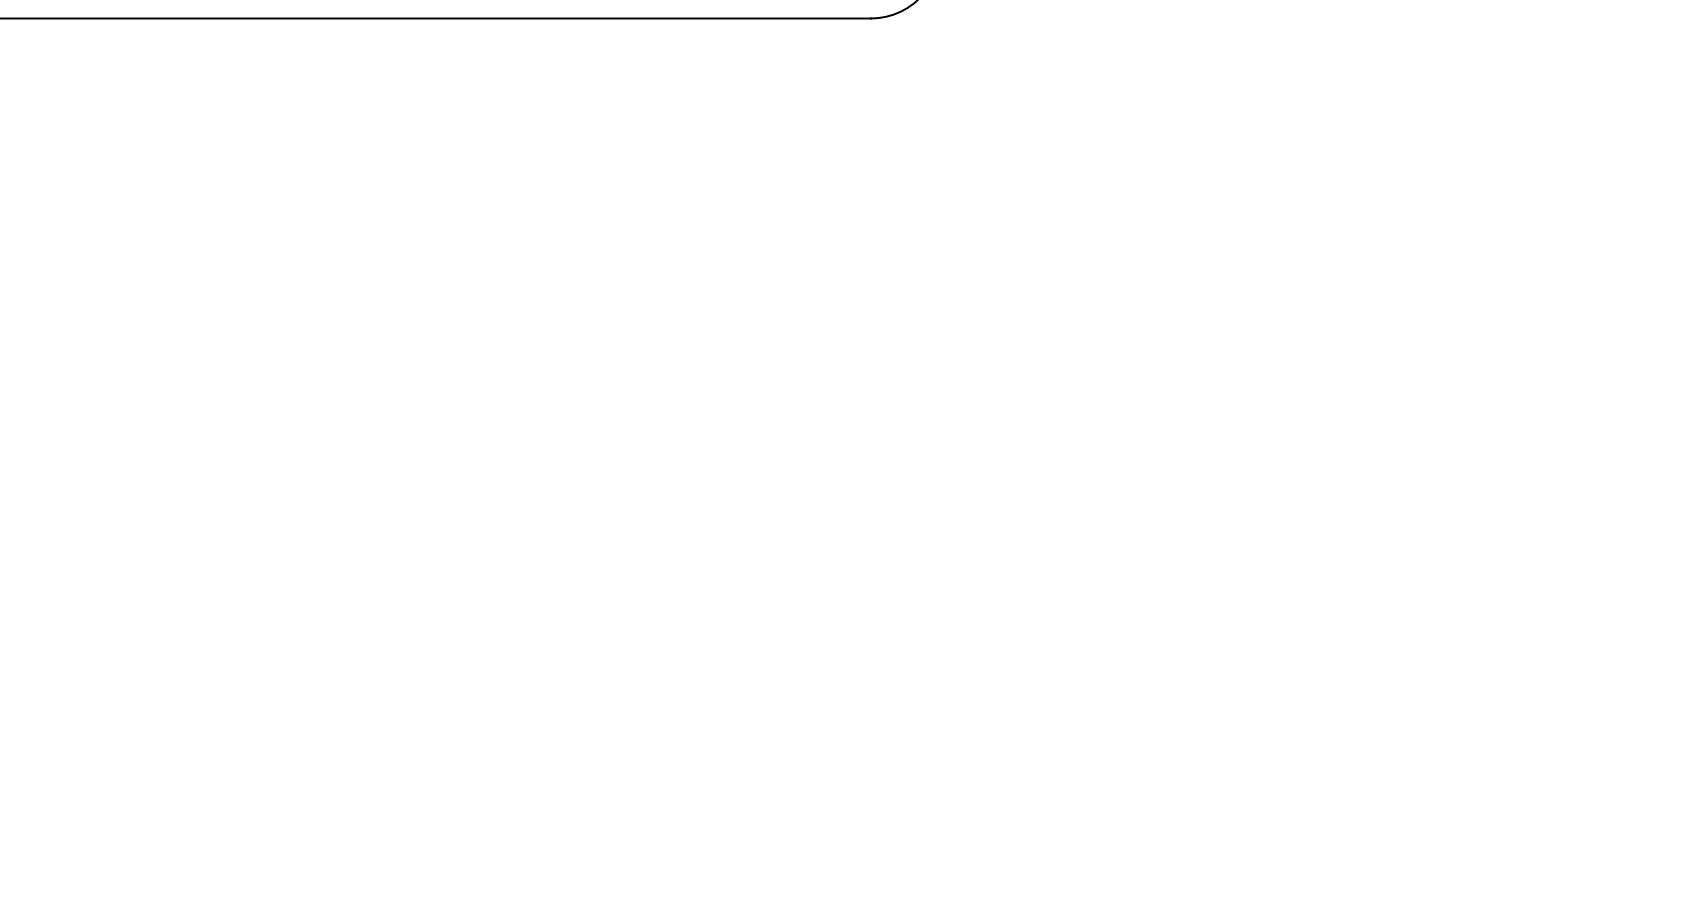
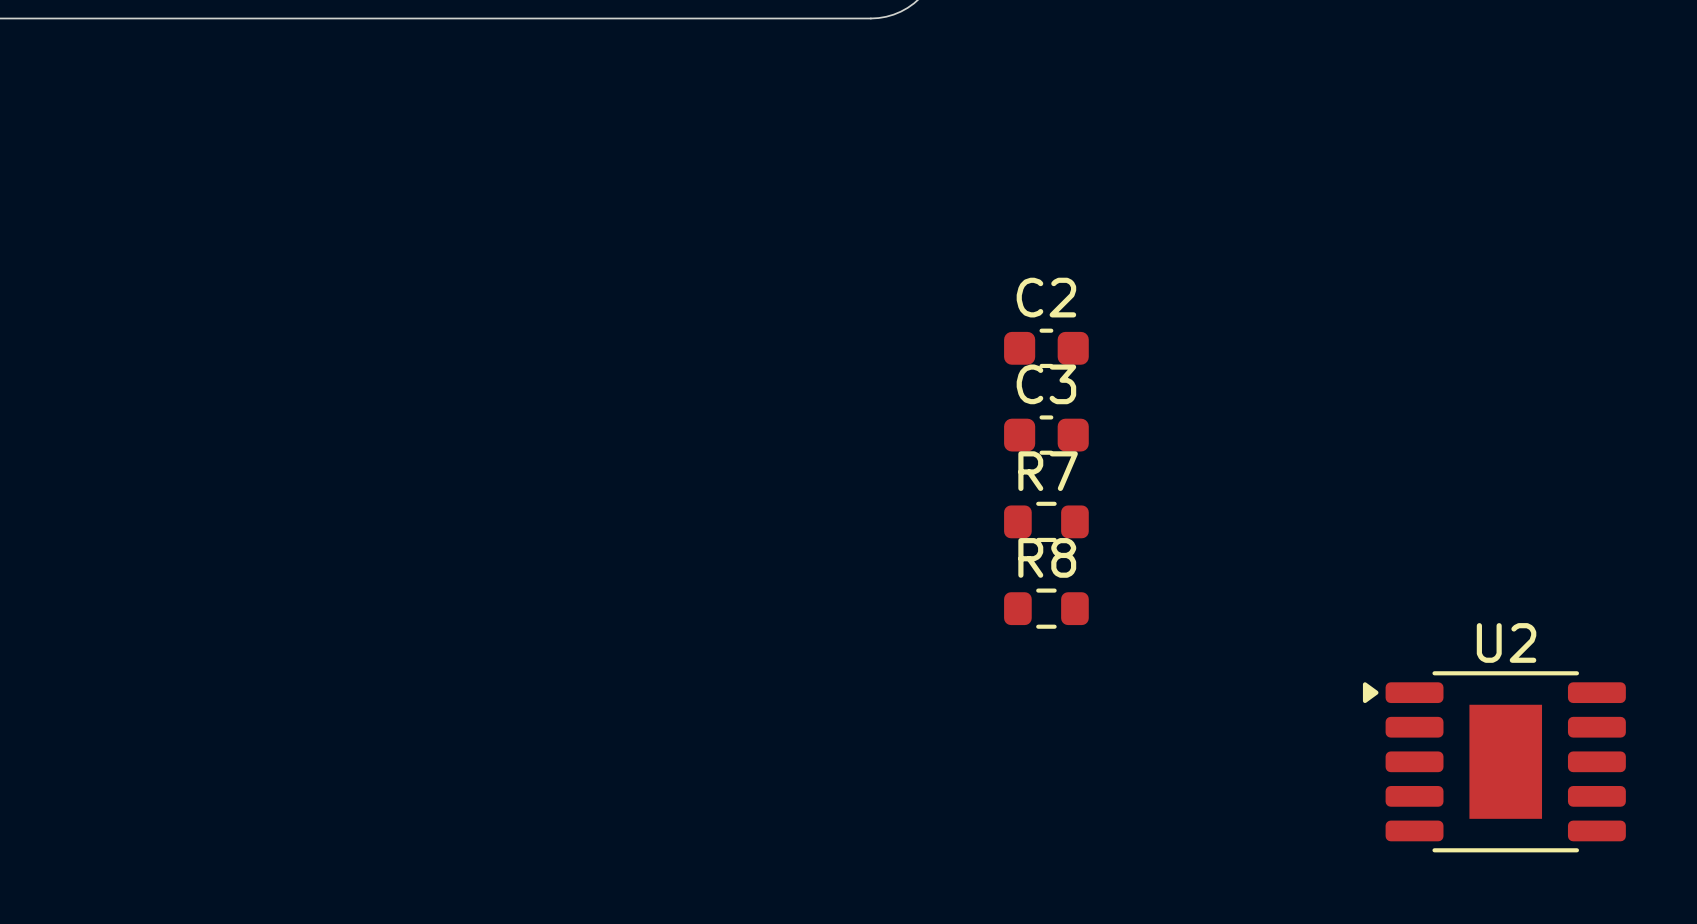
C2: none -> (1046, 348)
C3: none -> (1046, 435)
R7: none -> (1046, 521)
R8: none -> (1046, 608)
U2: none -> (1494, 761)

